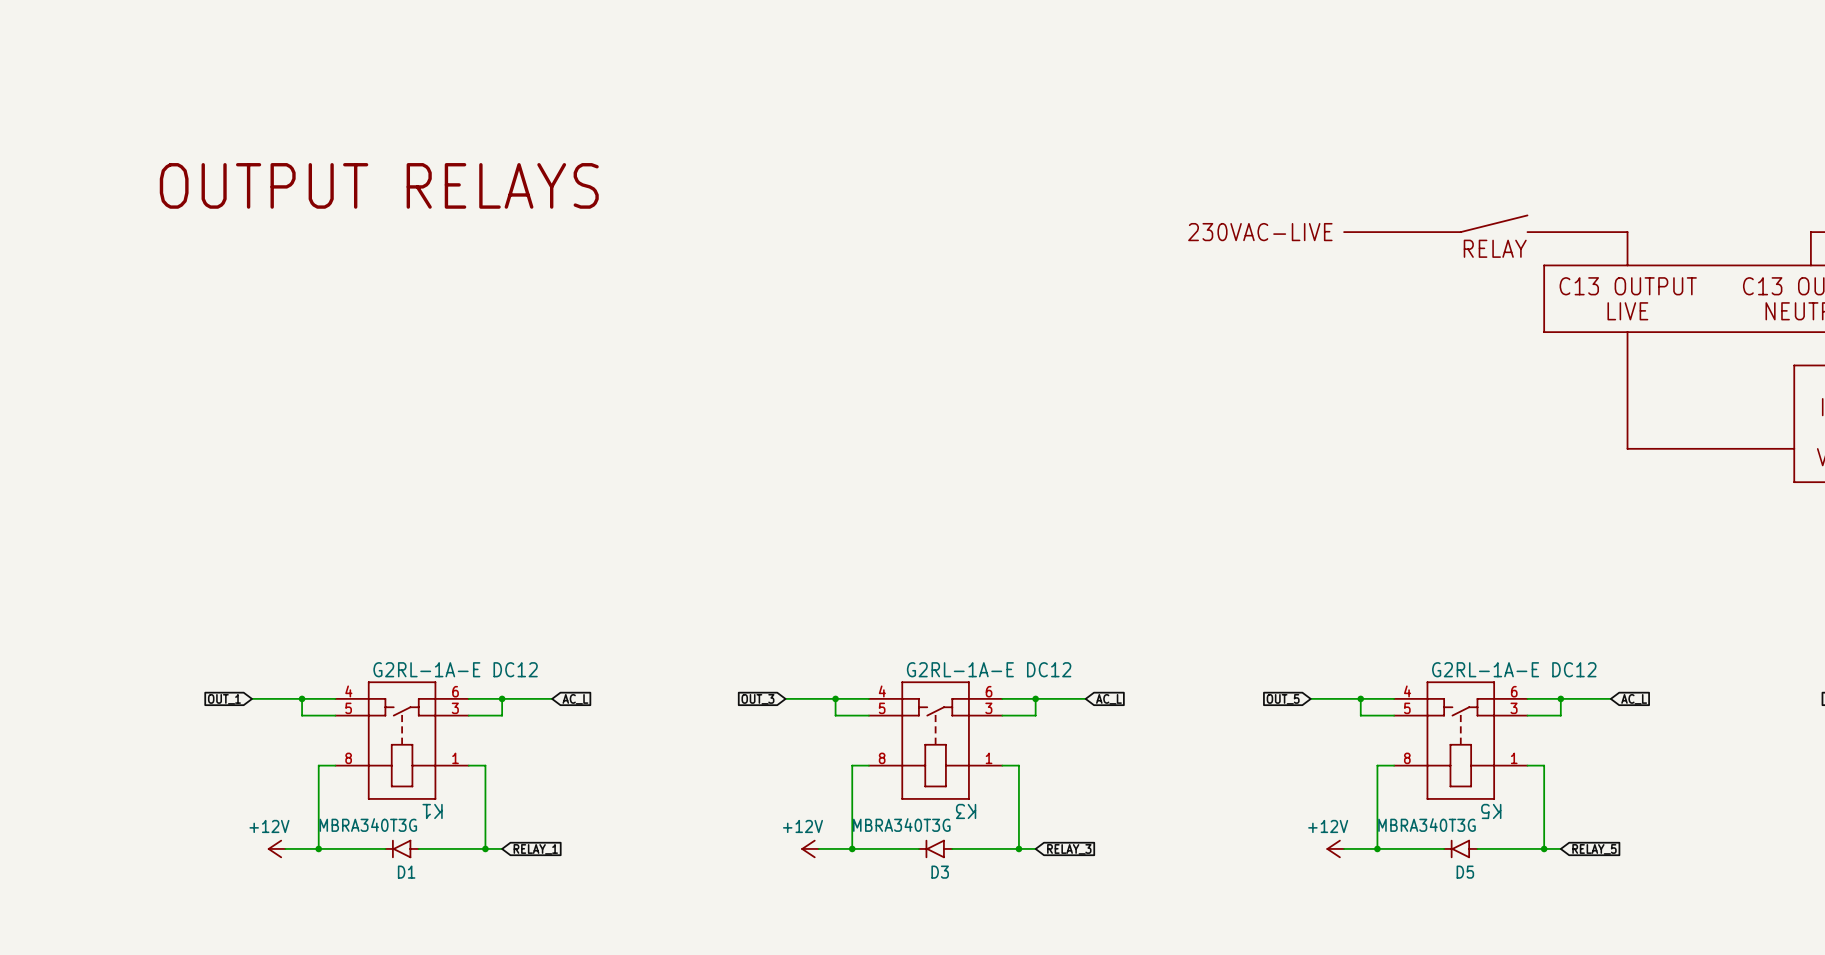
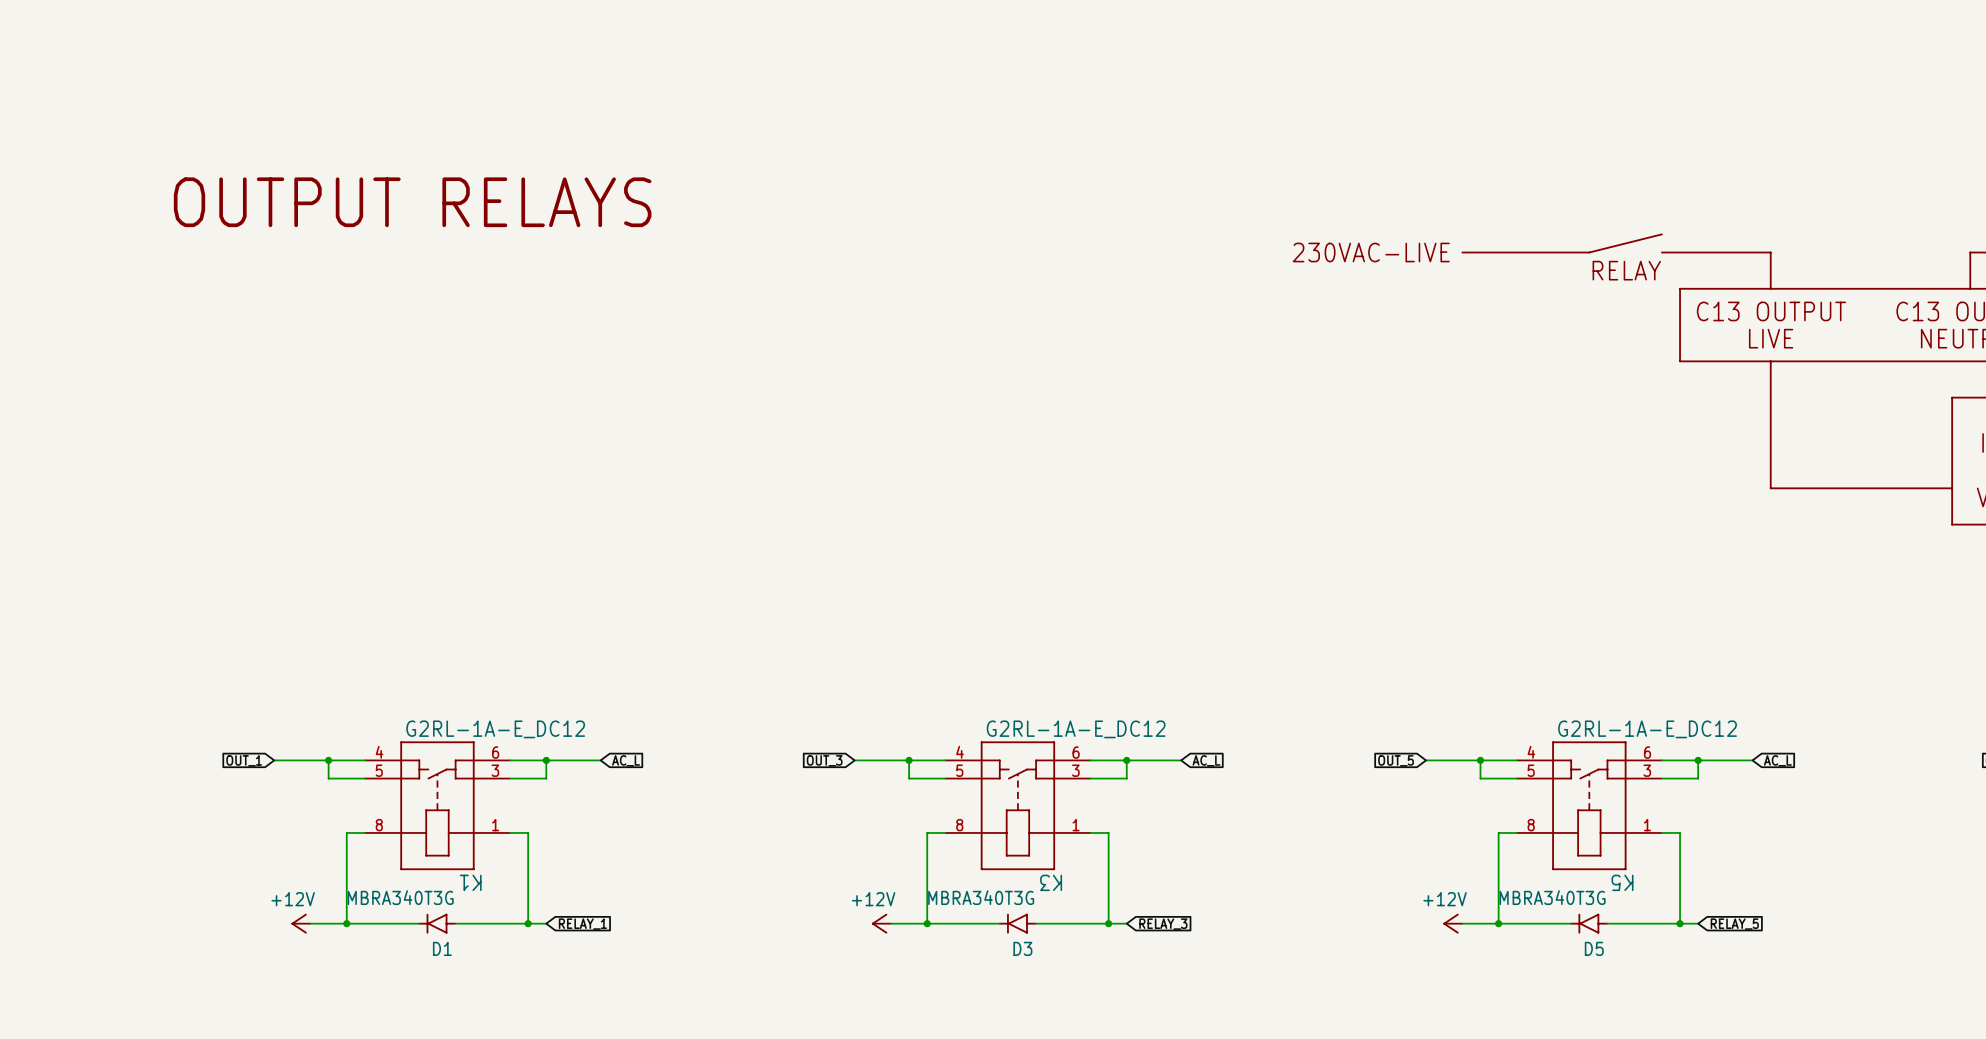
K1 value: G2RL-1A-E DC12 (455, 669) -> G2RL-1A-E_DC12 (495, 729)
K3 value: G2RL-1A-E DC12 (989, 669) -> G2RL-1A-E_DC12 (1076, 729)
K5 value: G2RL-1A-E DC12 (1514, 669) -> G2RL-1A-E_DC12 (1647, 729)

